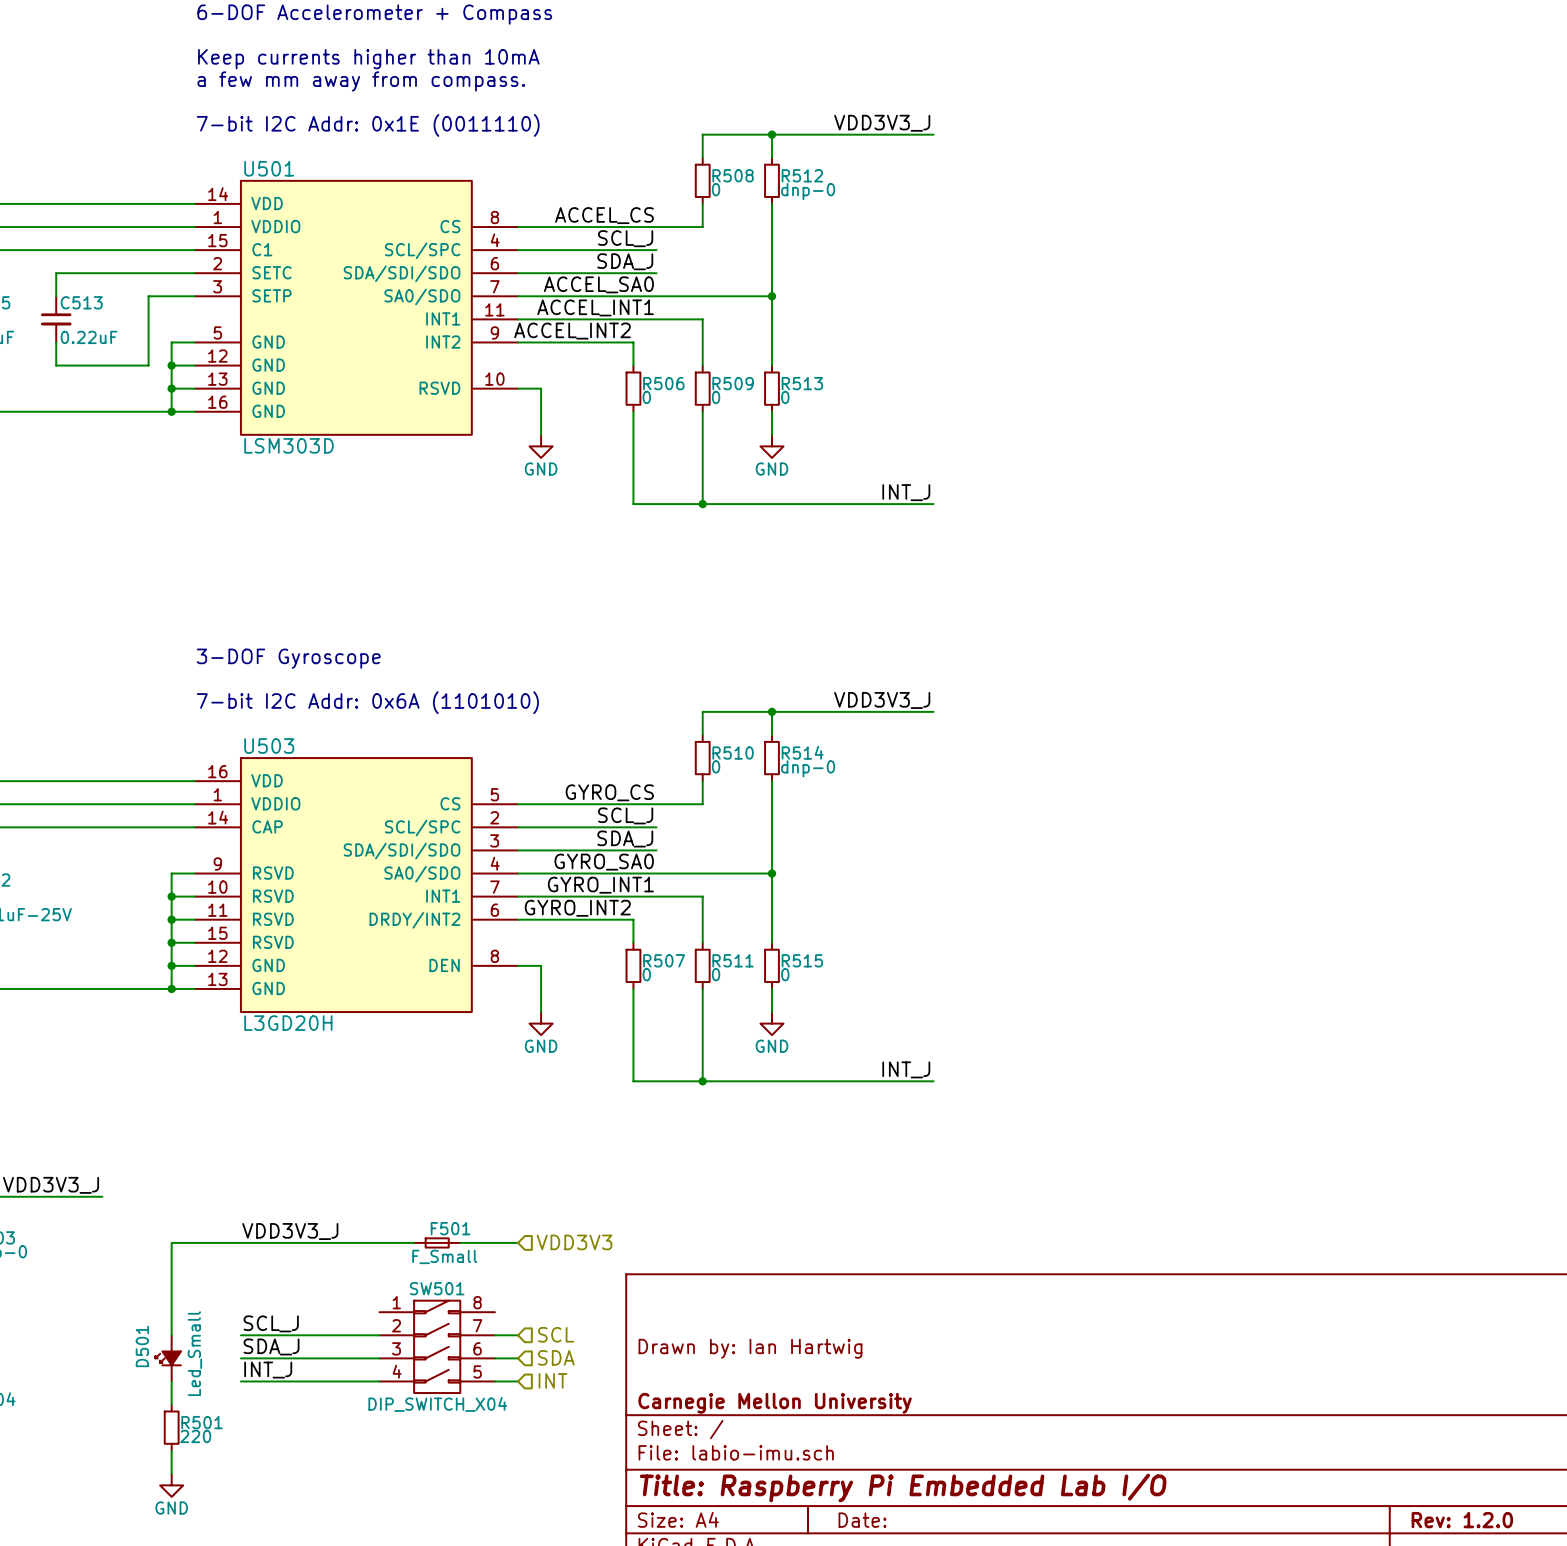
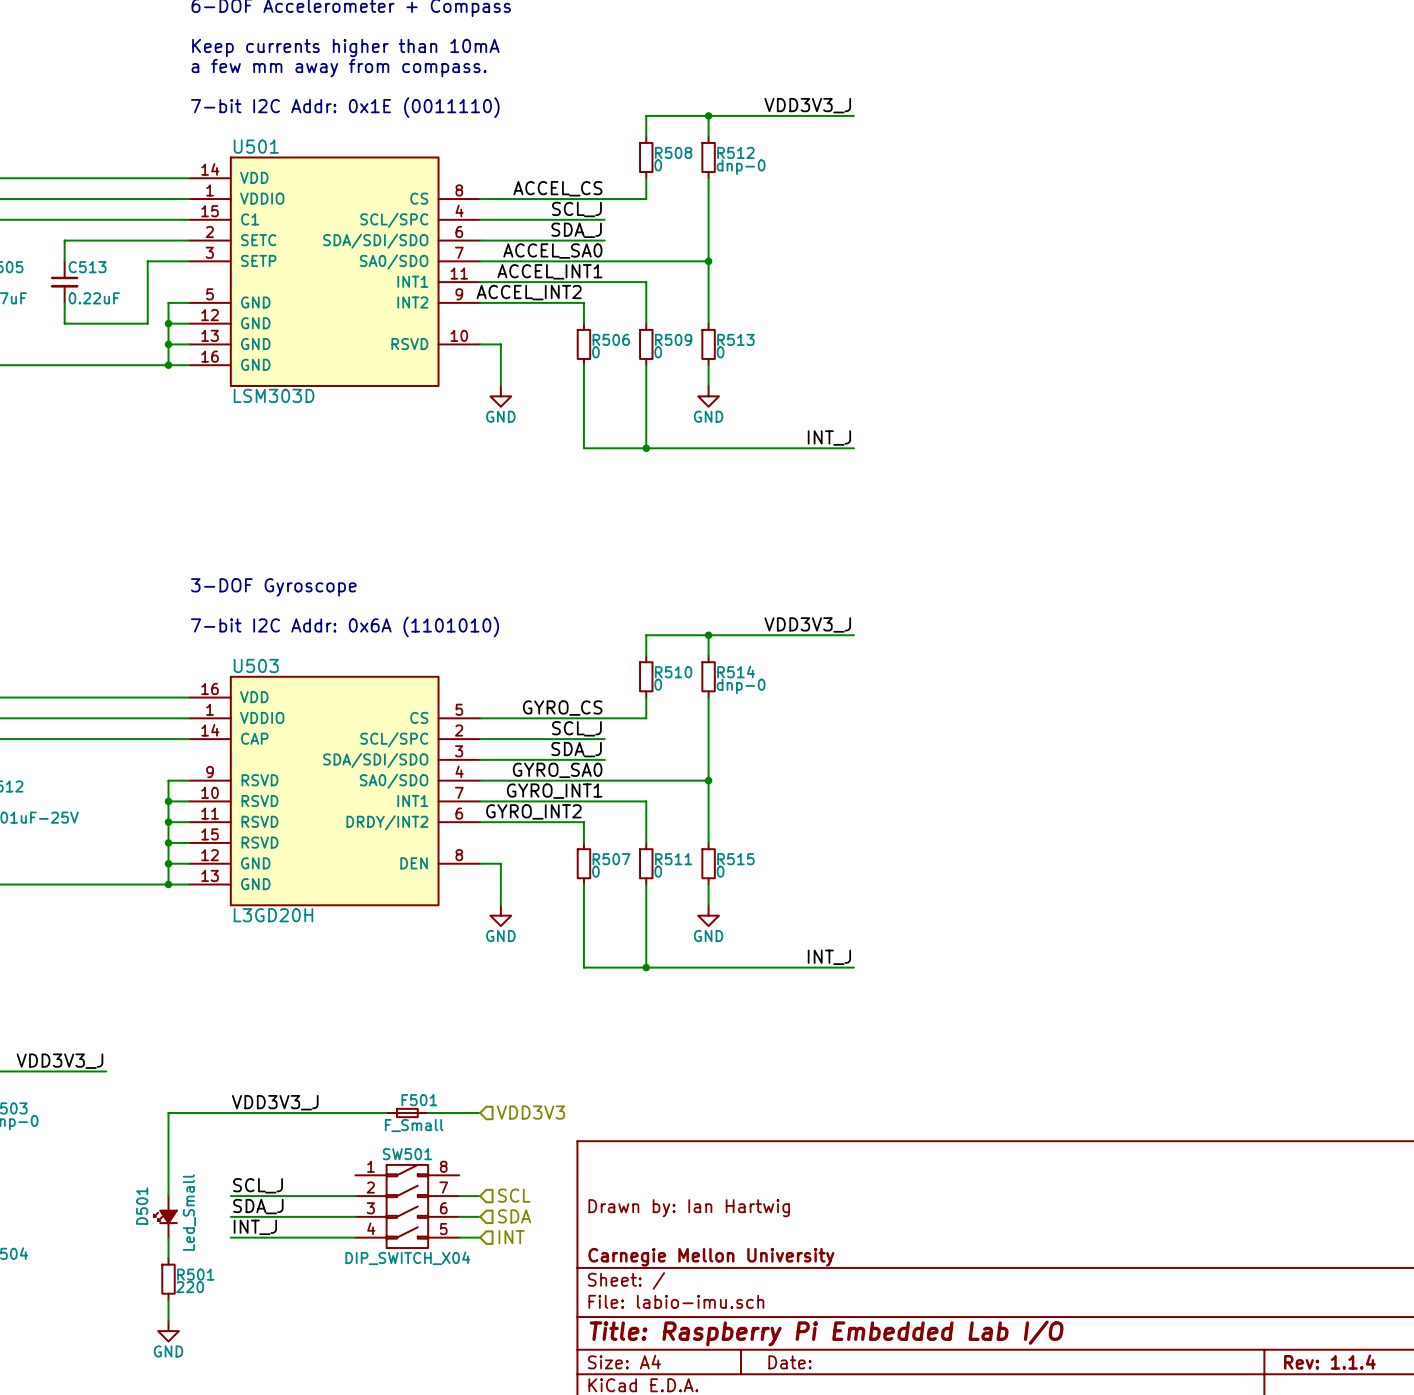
title block: Rev: 1.2.0 (1462, 1520) -> Rev: 1.1.4 (1329, 1362)

